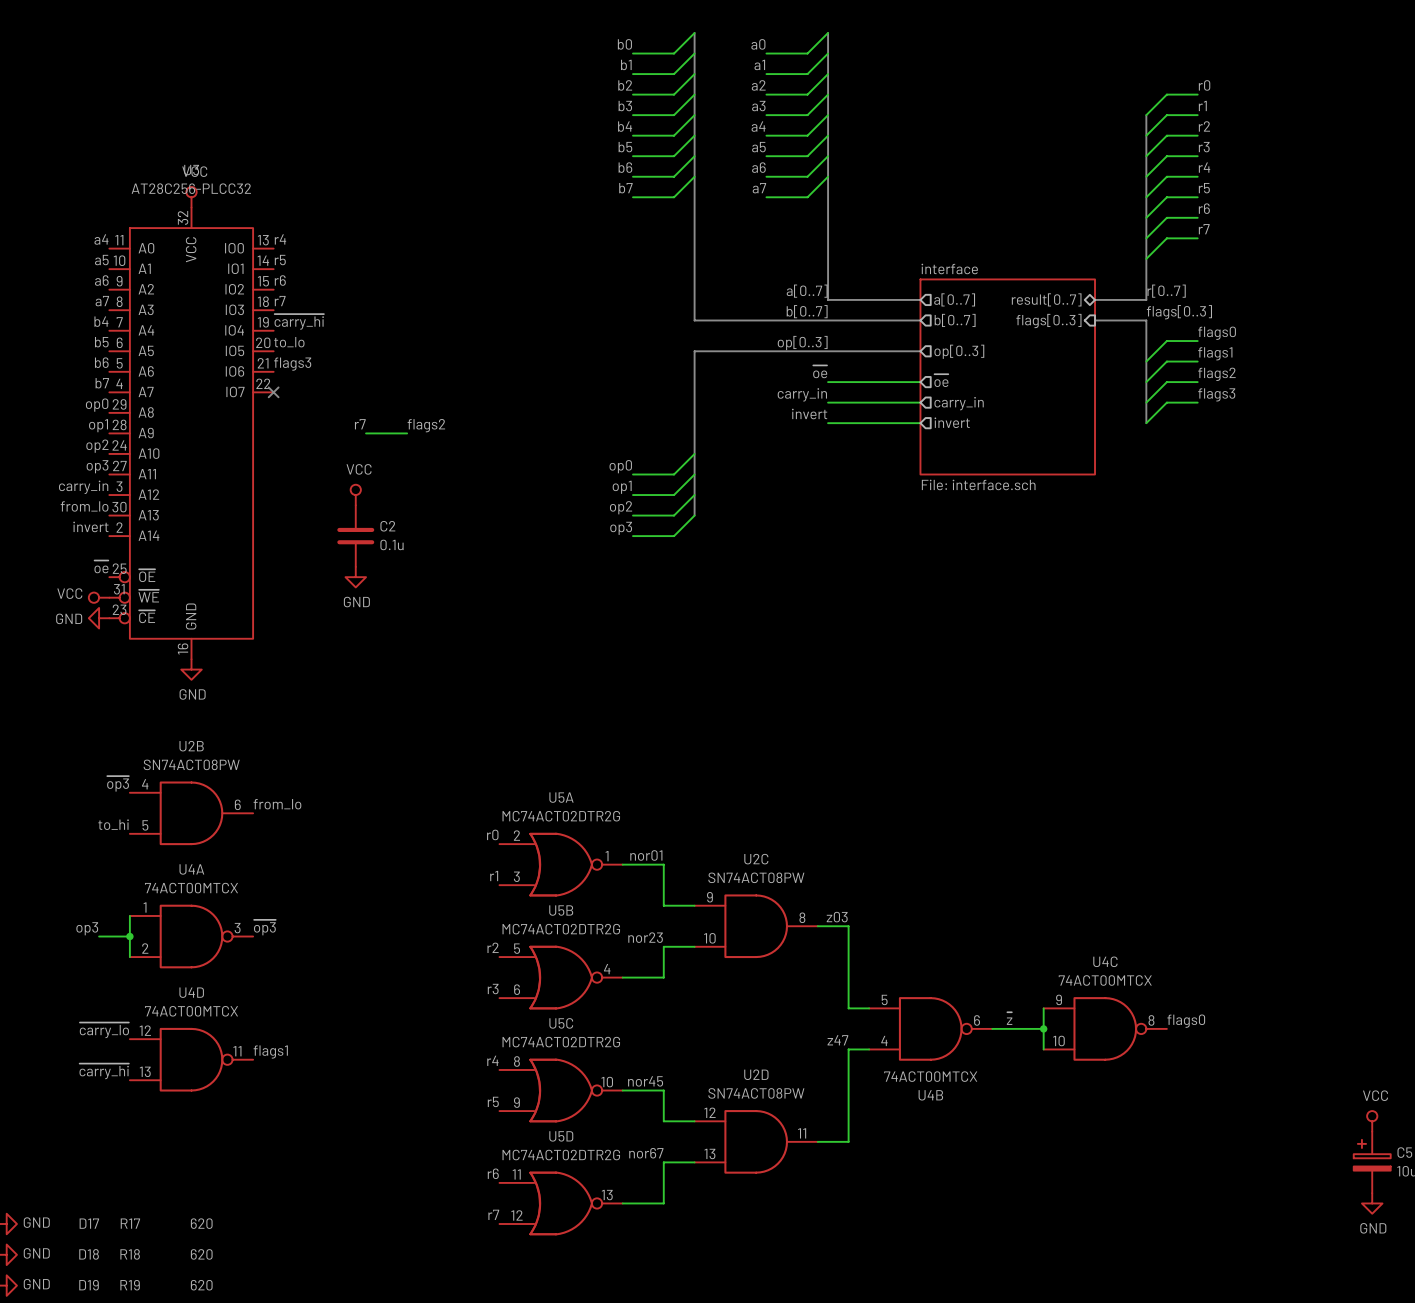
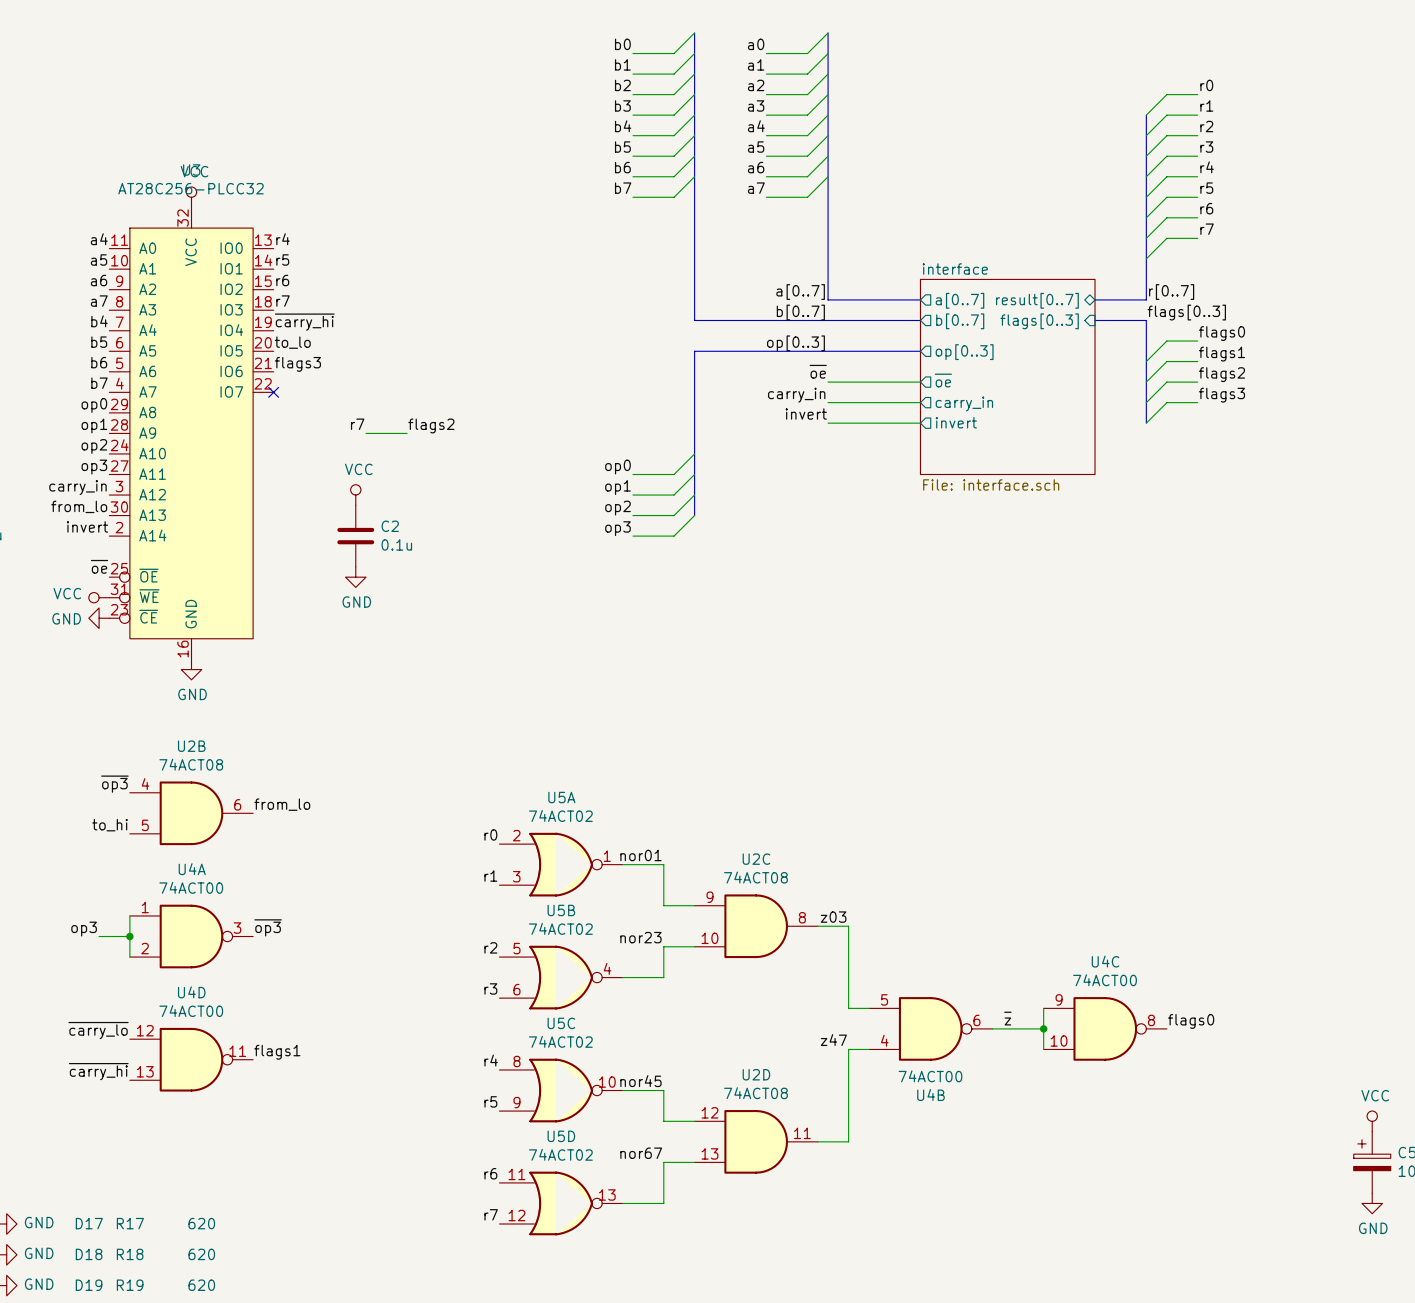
U2B value: SN74ACT08PW (191, 764) -> 74ACT08 (191, 764)
U5A value: MC74ACT02DTR2G (561, 816) -> 74ACT02 (560, 815)
U2C value: SN74ACT08PW (756, 877) -> 74ACT08 (755, 877)
U4A value: 74ACT00MTCX (191, 888) -> 74ACT00 (191, 887)
U5B value: MC74ACT02DTR2G (561, 929) -> 74ACT02 (560, 928)
U4C value: 74ACT00MTCX (1105, 980) -> 74ACT00 (1105, 980)
U4D value: 74ACT00MTCX (191, 1011) -> 74ACT00 (191, 1011)
U5C value: MC74ACT02DTR2G (561, 1042) -> 74ACT02 (560, 1041)
U4B value: 74ACT00MTCX (930, 1076) -> 74ACT00 (930, 1076)
U2D value: SN74ACT08PW (756, 1093) -> 74ACT08 (755, 1093)
U5D value: MC74ACT02DTR2G (561, 1155) -> 74ACT02 (560, 1154)

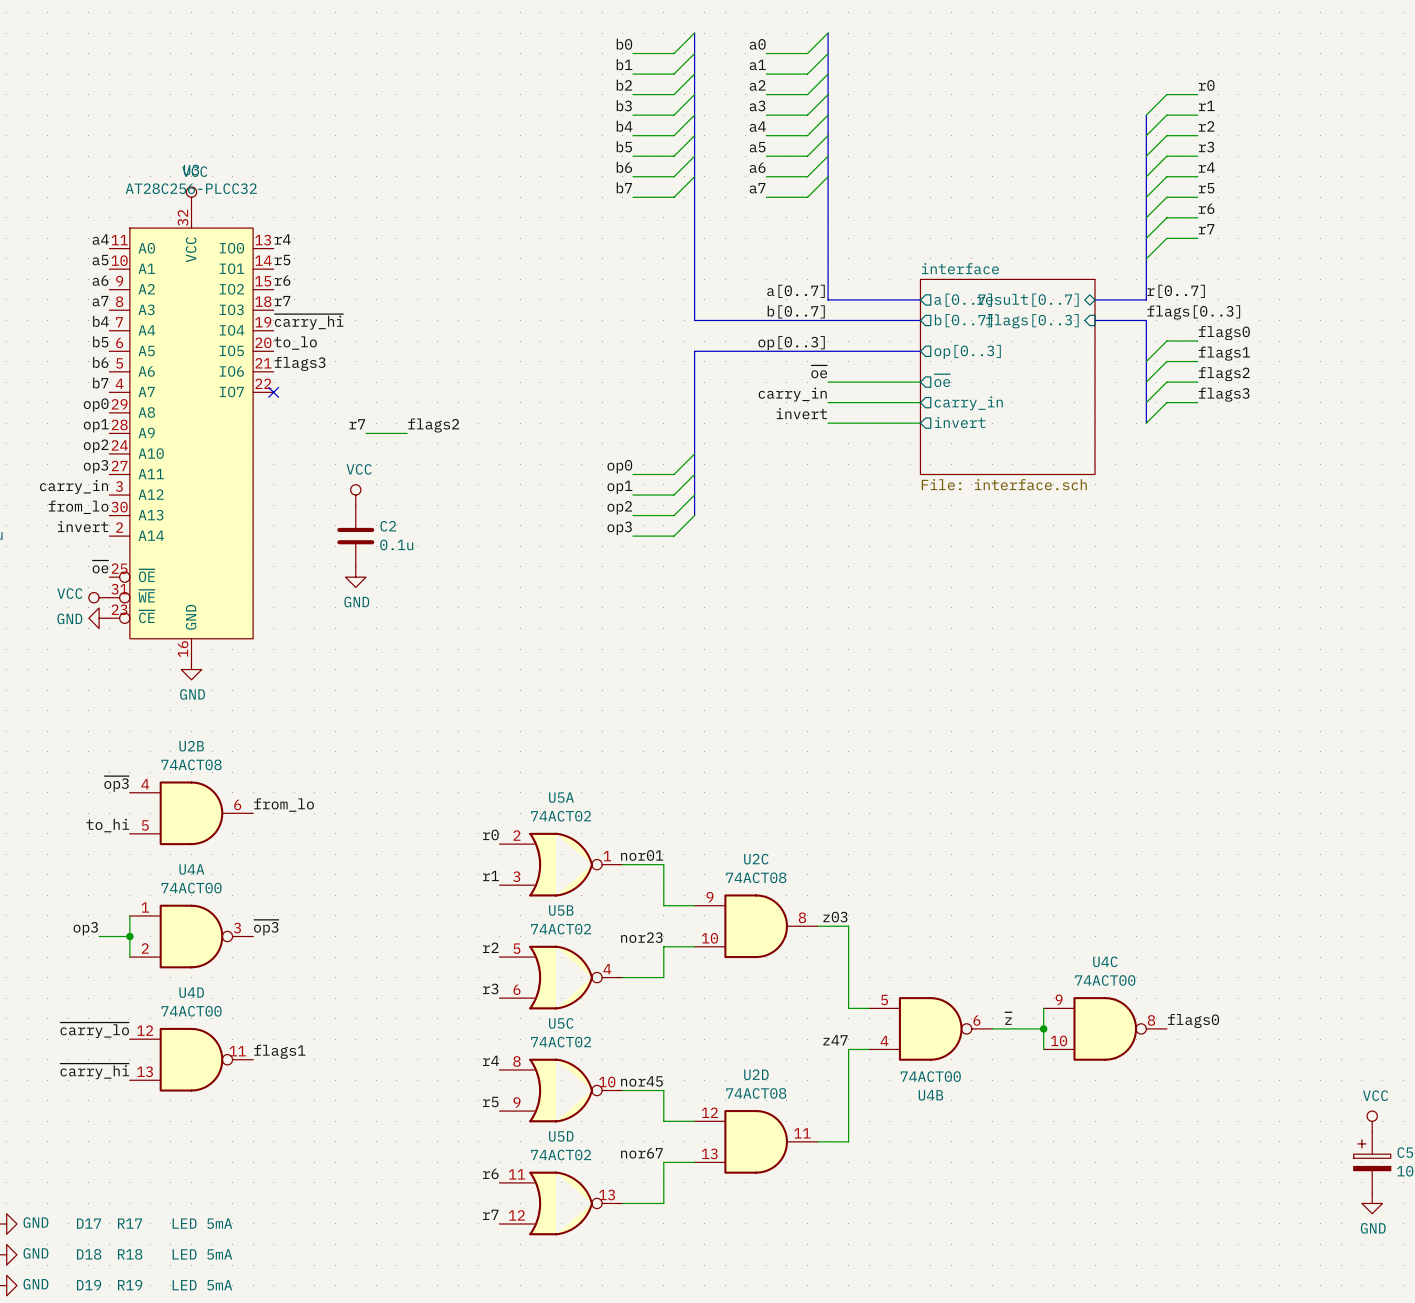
R17 value: 620 (201, 1223) -> LED 5mA (202, 1223)
R18 value: 620 (201, 1254) -> LED 5mA (202, 1254)
R19 value: 620 (201, 1285) -> LED 5mA (202, 1285)

